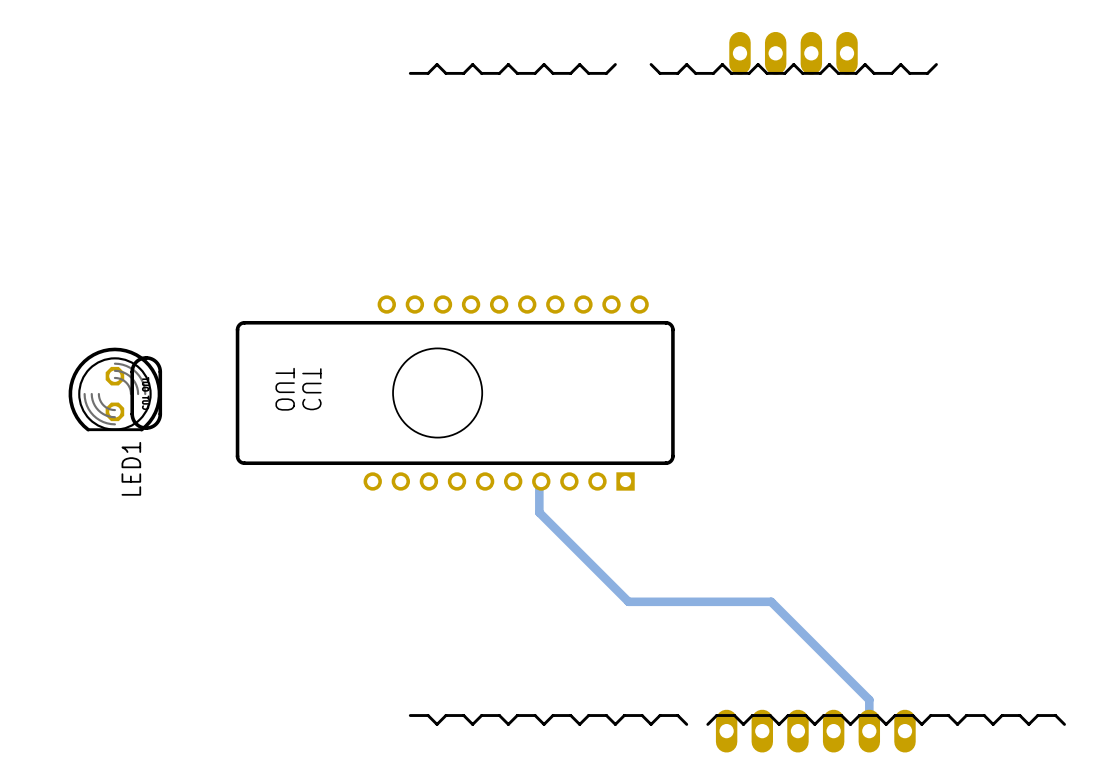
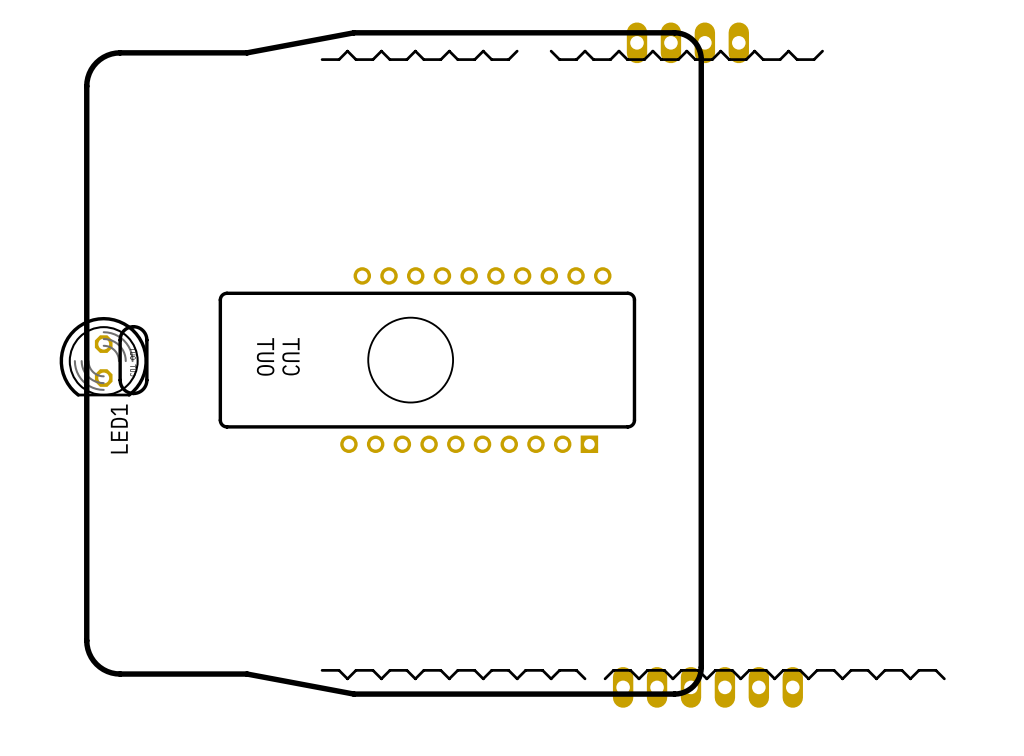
board edge: none -> (674, 32) (353, 32) (247, 52) (120, 52) (107, 55) (96, 62) (89, 73) (86, 86) (86, 640) (89, 653) (96, 664) (107, 671) (120, 674) (247, 674) (353, 694) (674, 694) (684, 692) (693, 686) (699, 677) (701, 667) (701, 59) (699, 49) (693, 40) (684, 34) (674, 32)
part position: (793, 53) -> (687, 42)
drawing position: (737, 394) -> (633, 364)
track: (541, 481) (539, 483) (539, 512) (628, 601) (771, 601) (869, 699) (869, 731) -> none
part position: (815, 731) -> (707, 687)

